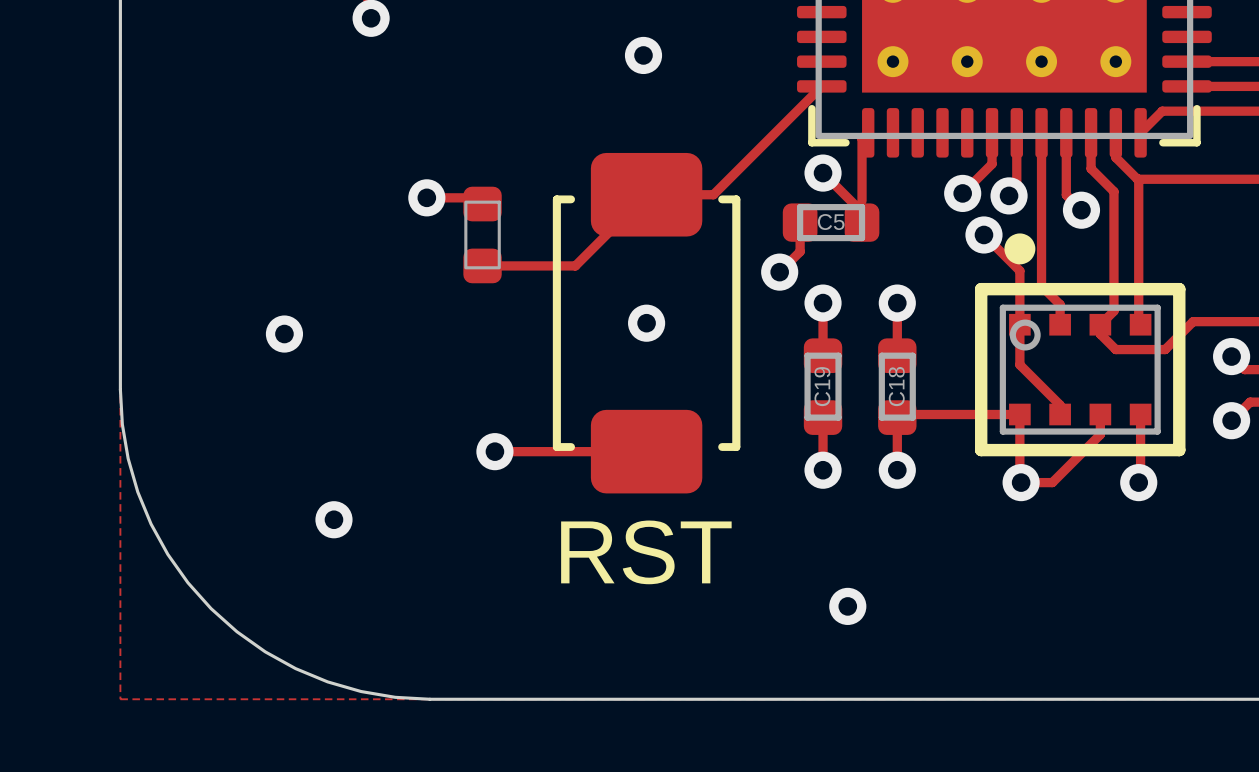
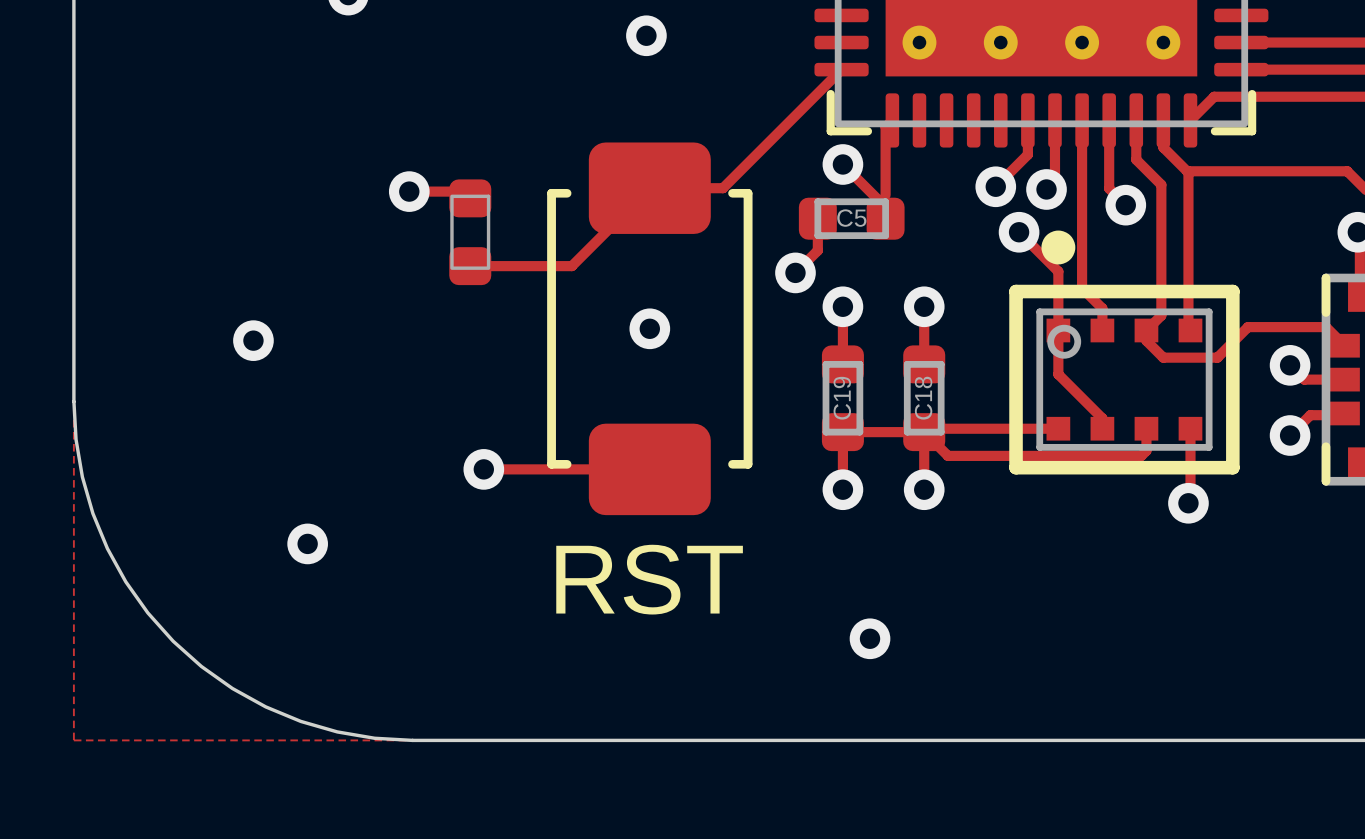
track: (1019, 414) (1021, 482) (1052, 482) (1095, 439) -> (842, 432) (924, 432) (948, 455) (1141, 455)
via: (1021, 482) -> none

